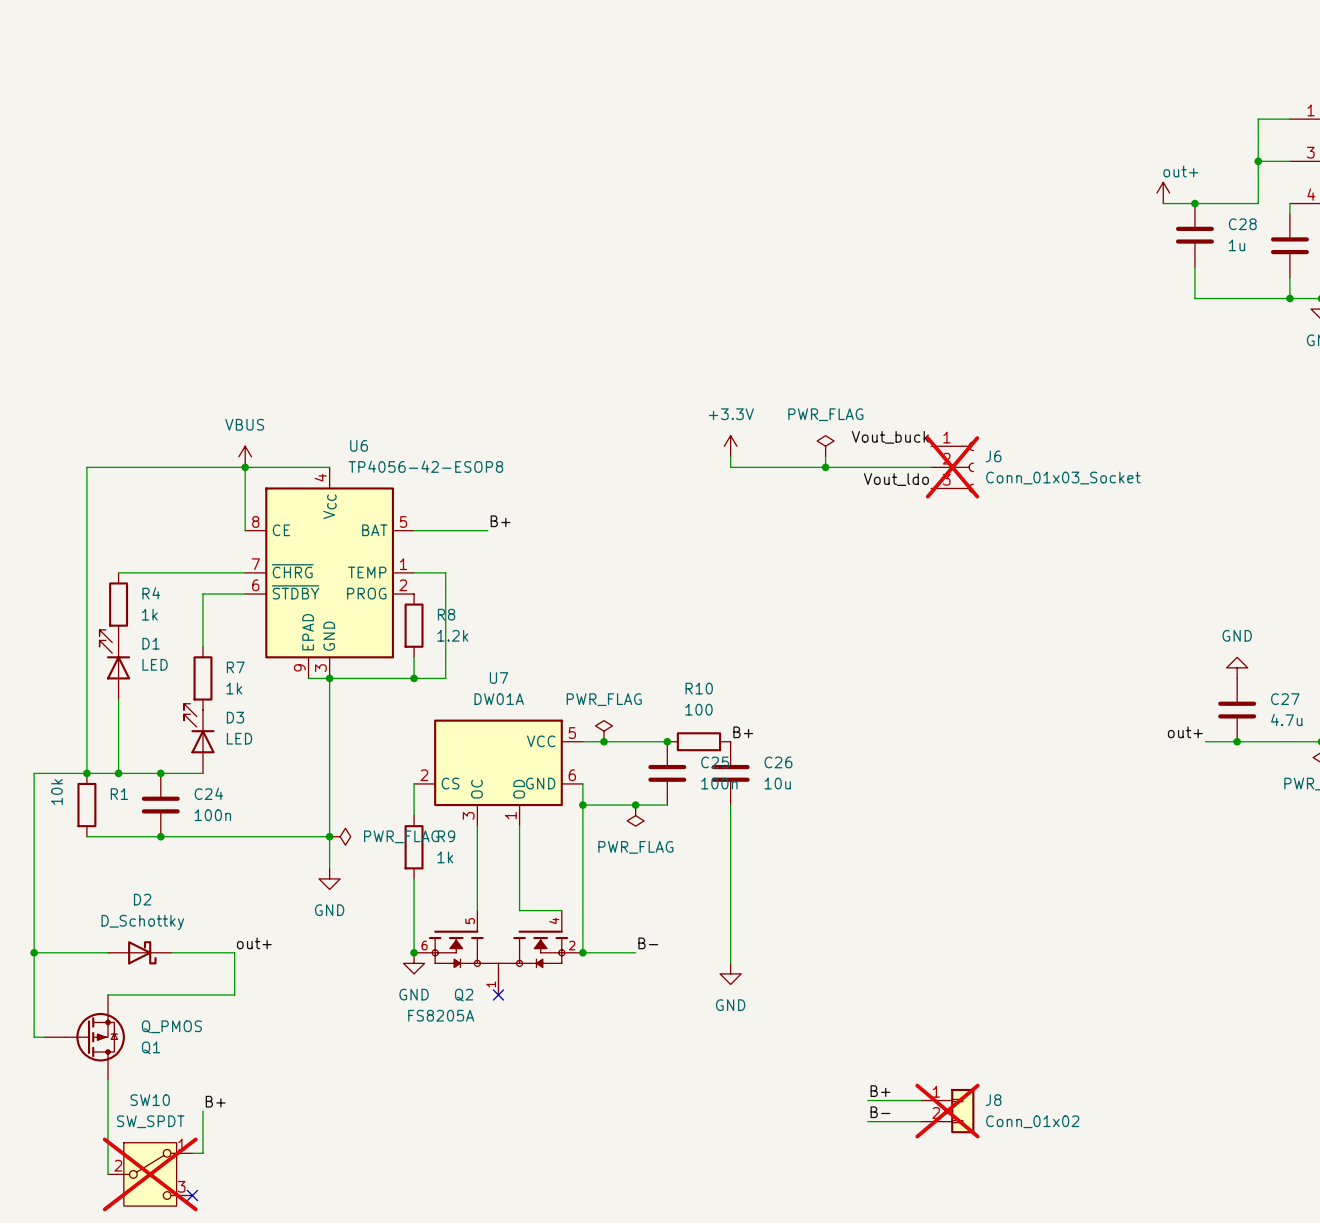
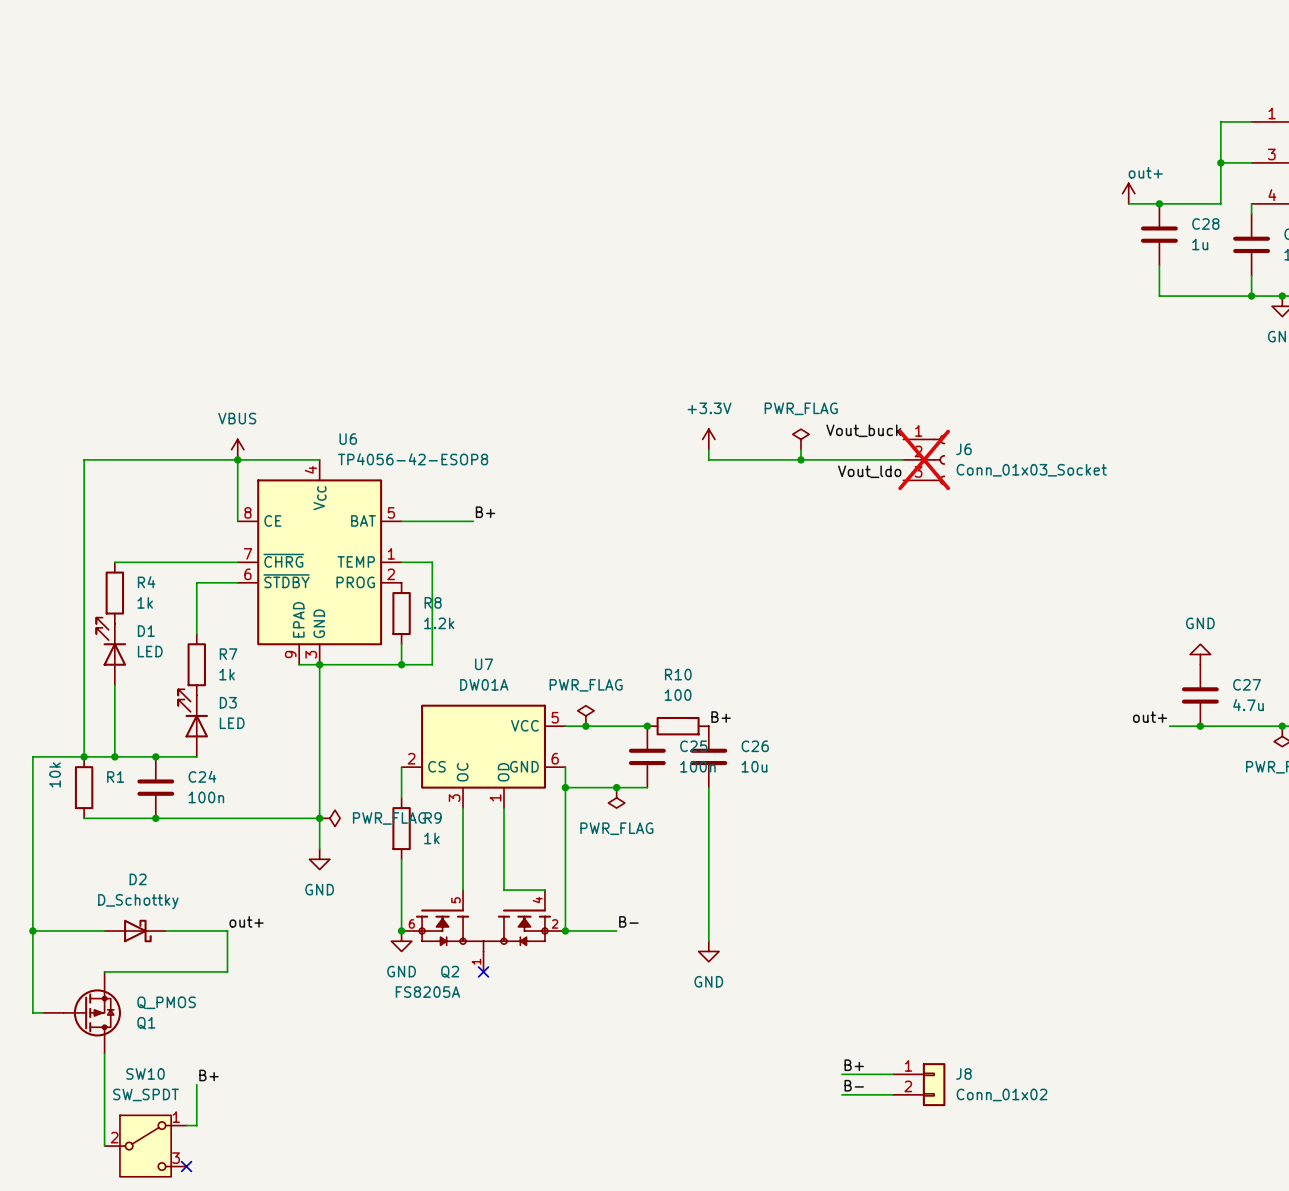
J8 do-not-place cross: (947, 1111) -> none
SW10 do-not-place cross: (150, 1174) -> none

